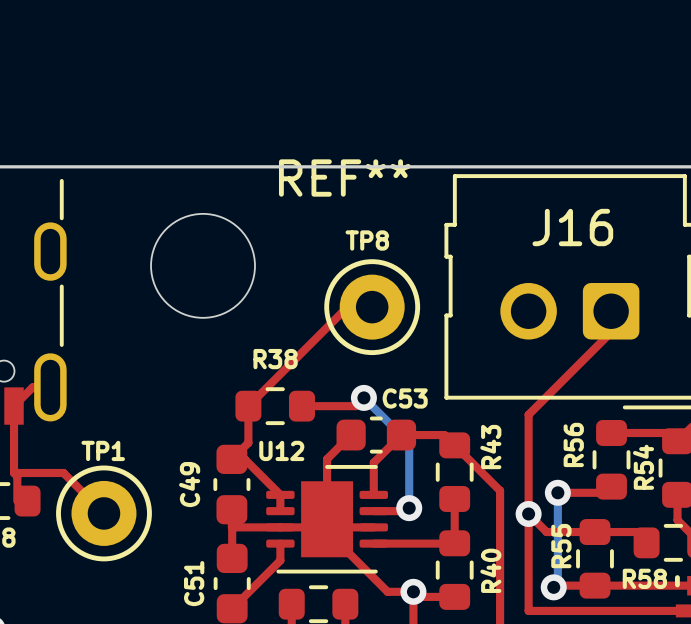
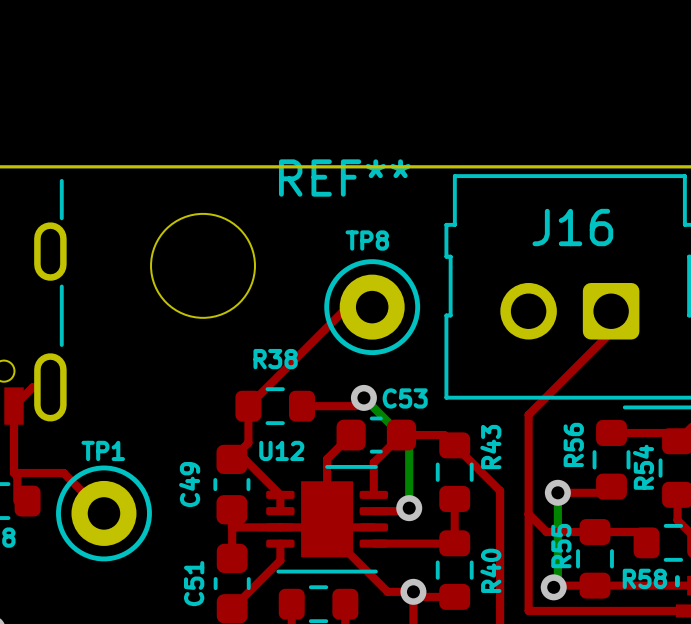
via: (528, 513) -> none

